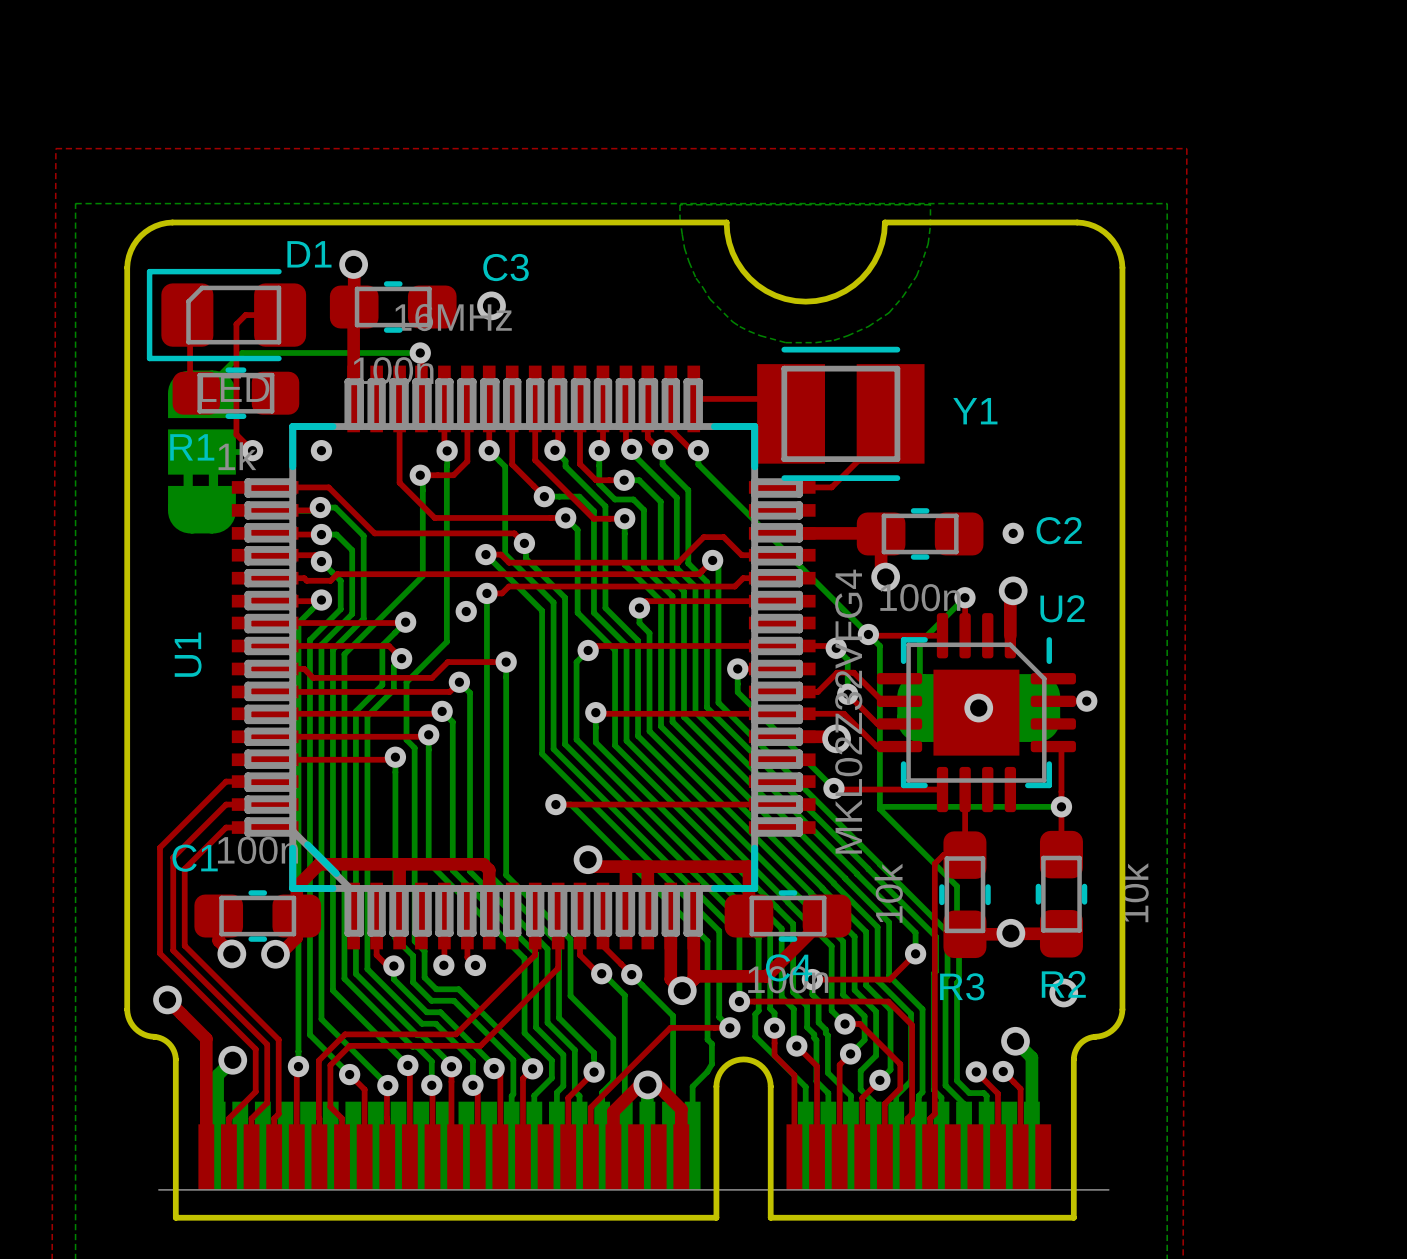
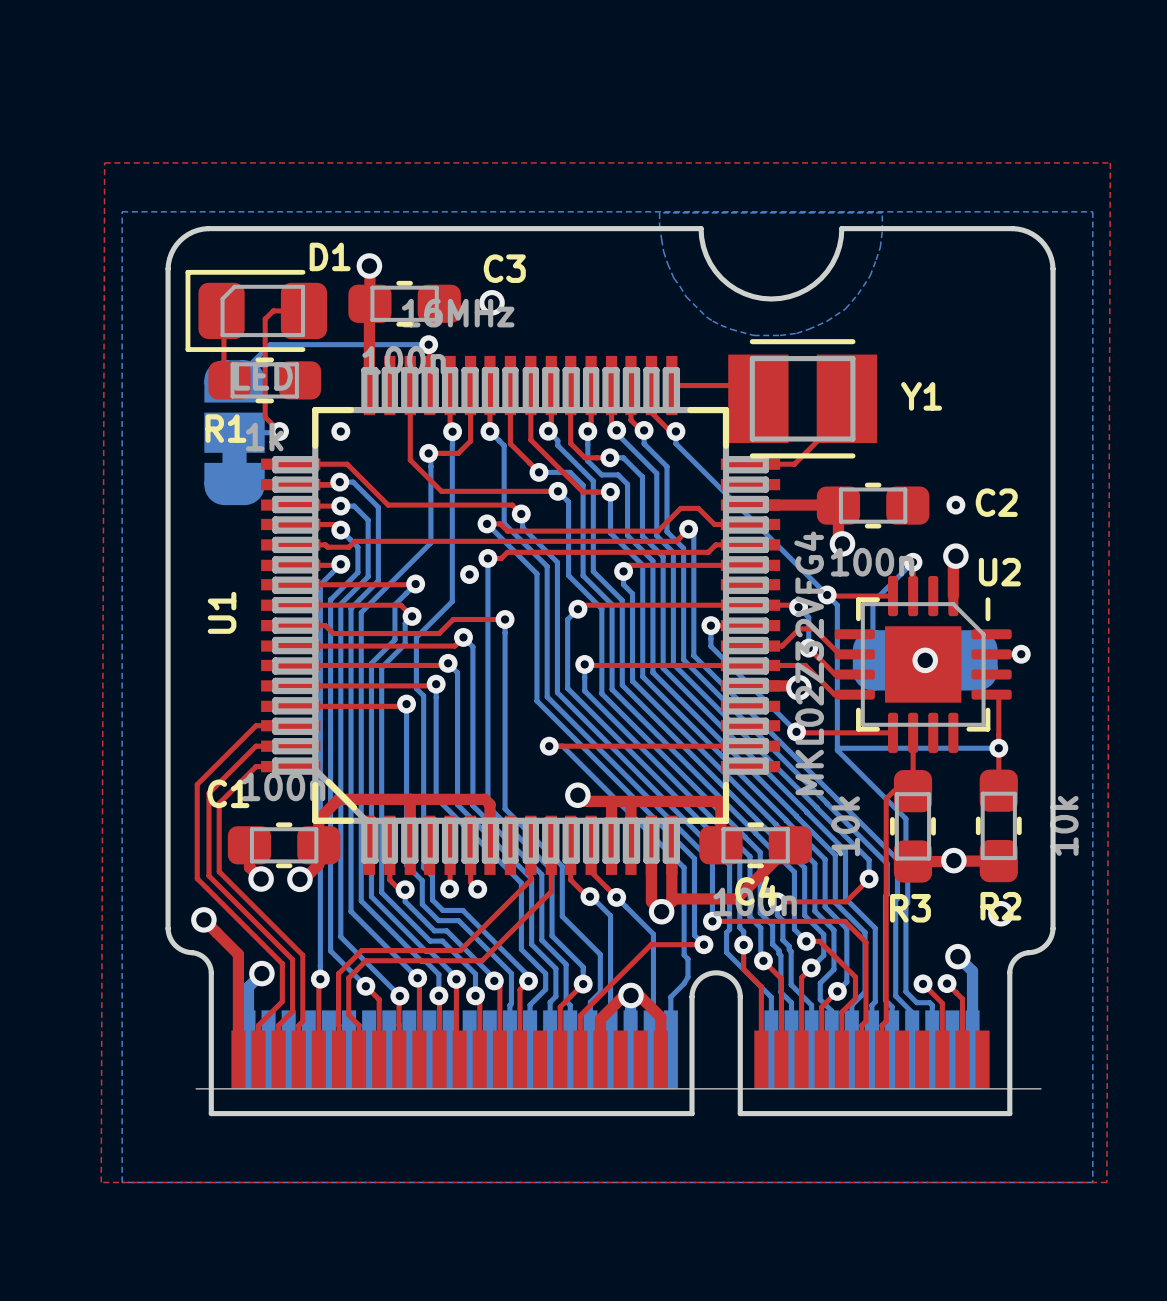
part footprint: [168, 370, 236, 534] -> [204, 360, 265, 506]

